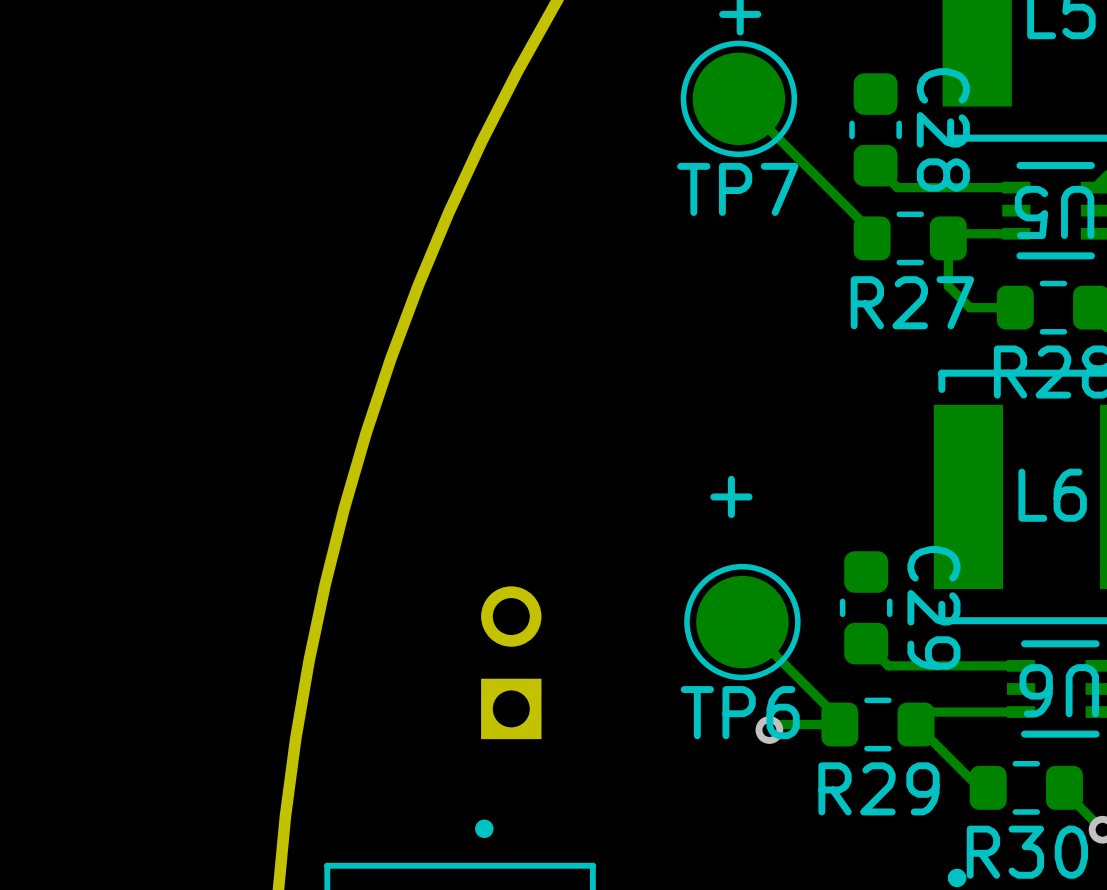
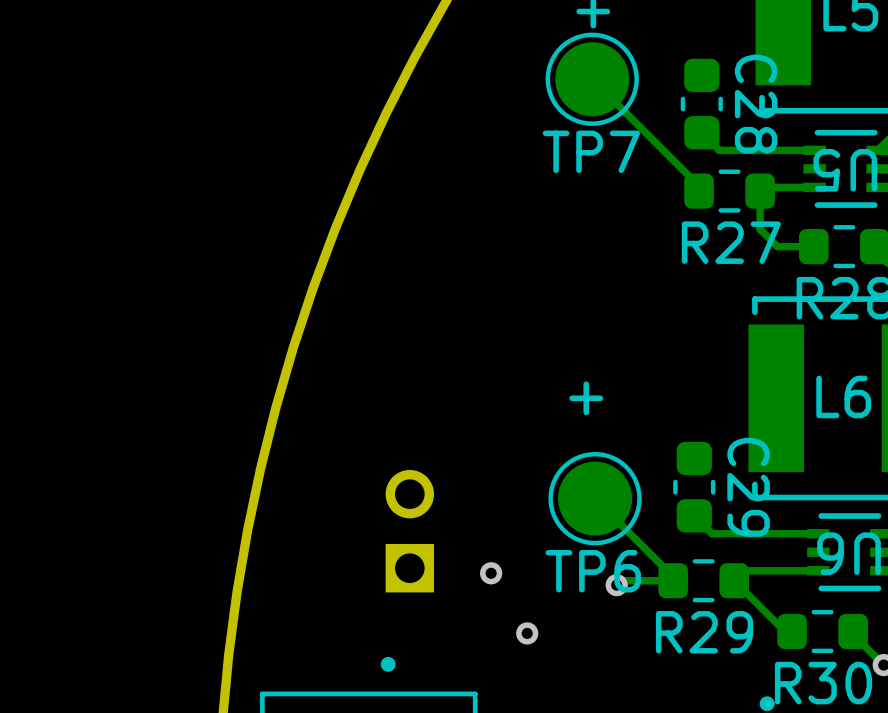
via: none -> (491, 573)
via: none -> (527, 633)

